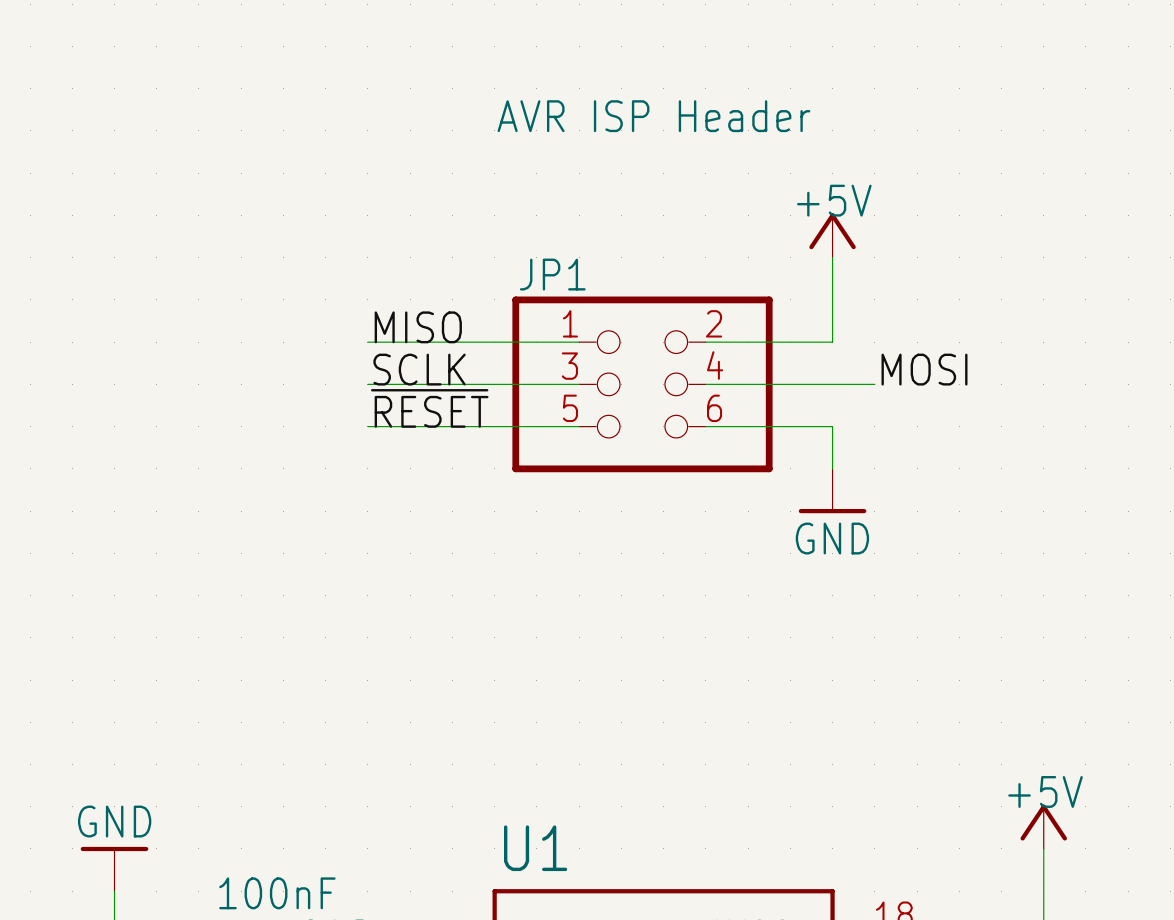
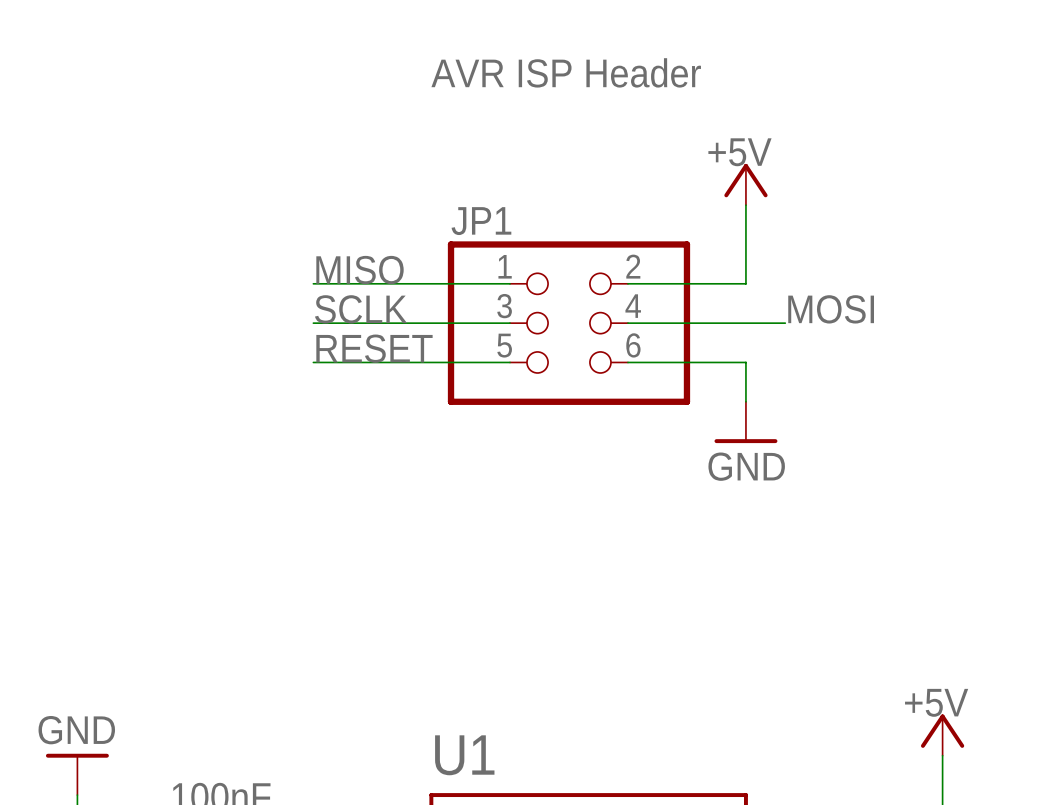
label: ~{RESET} (429, 408) -> RESET (374, 348)

